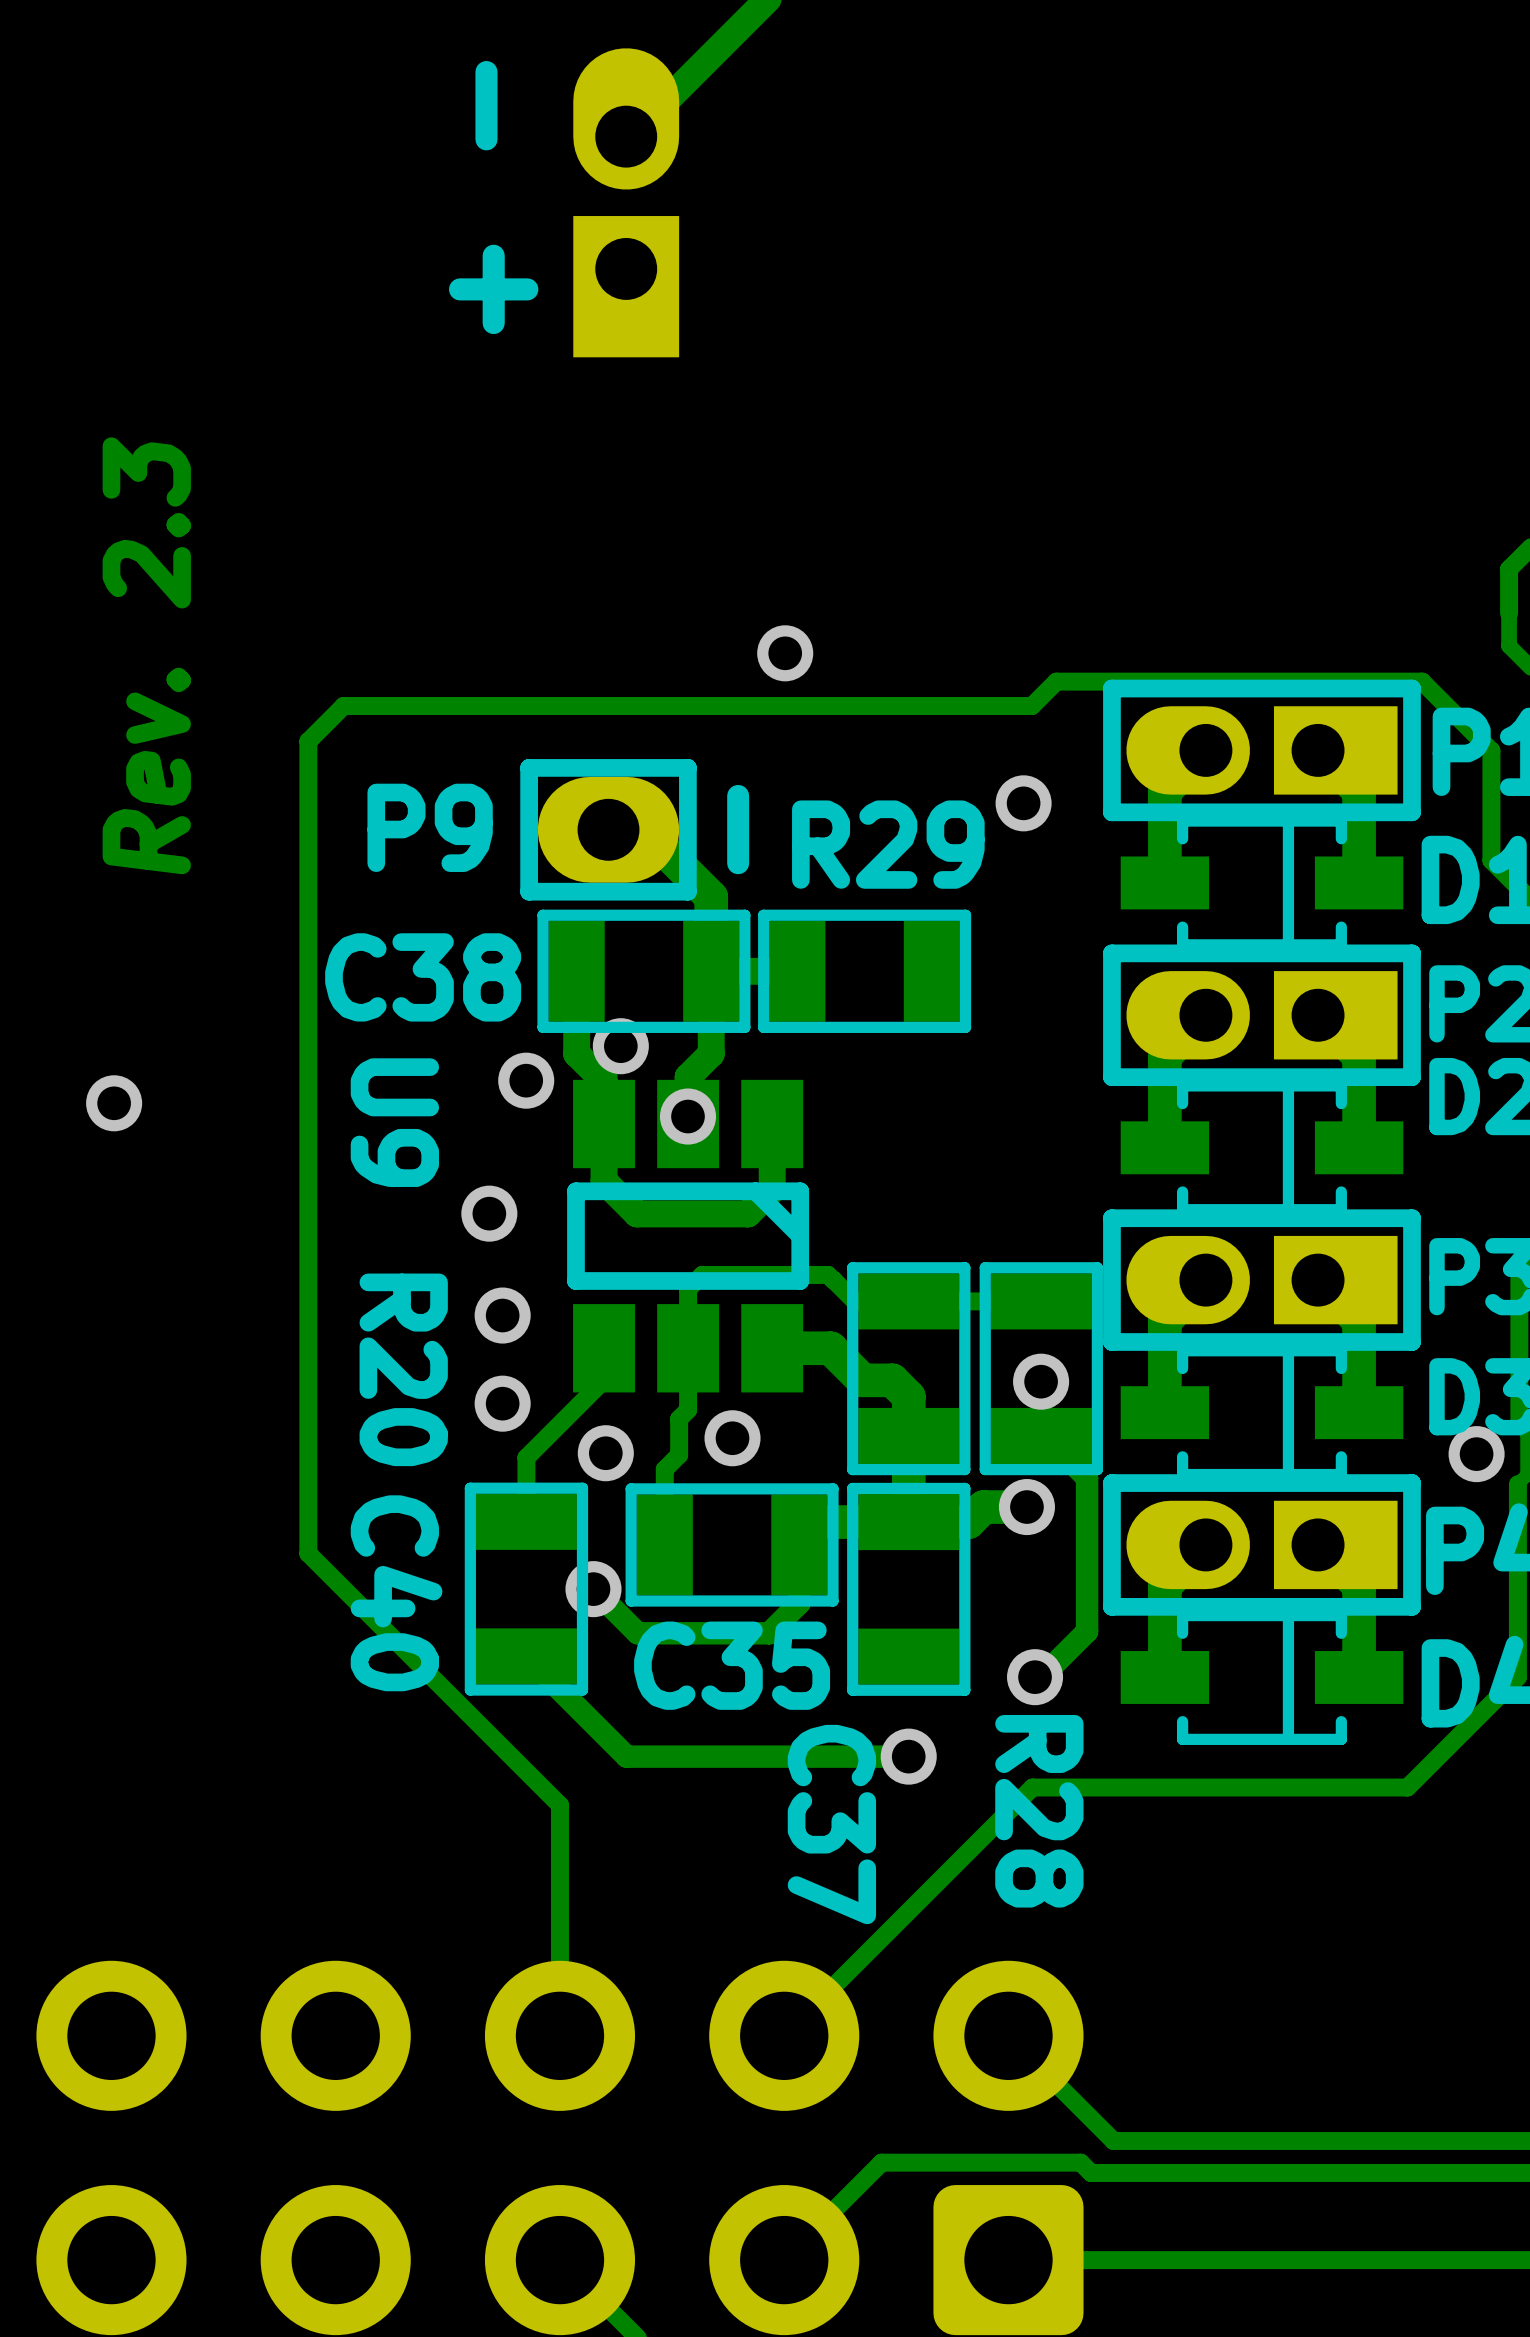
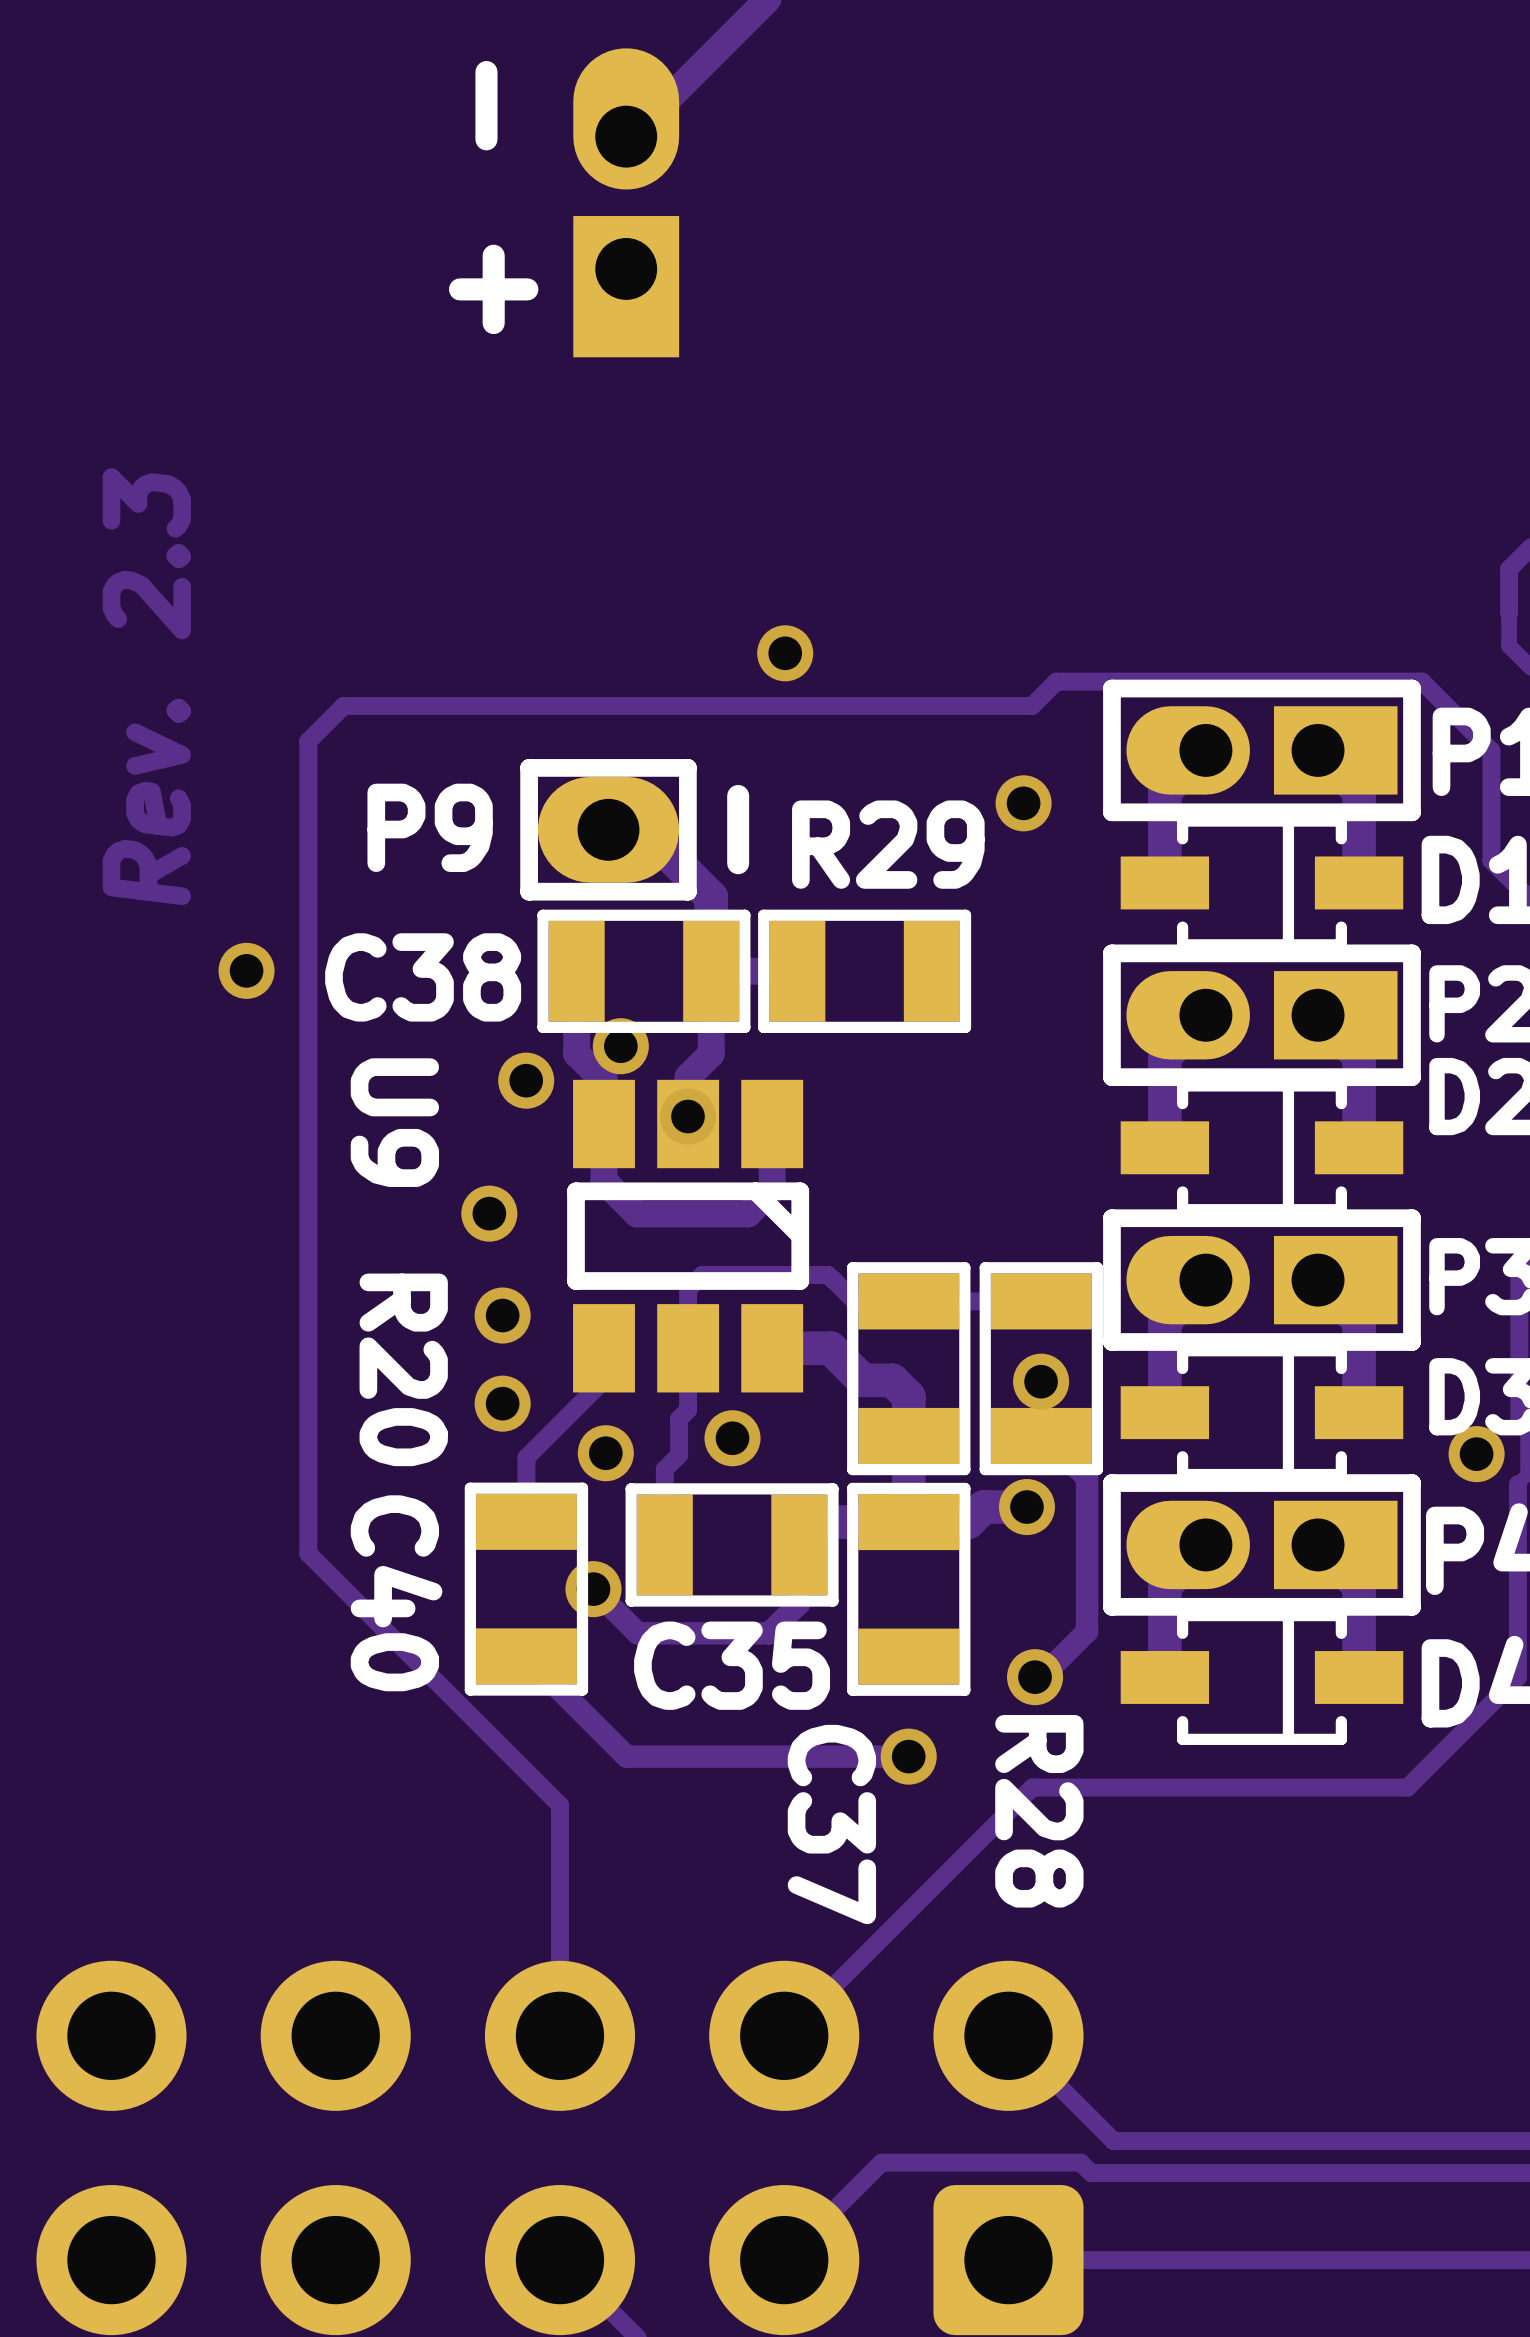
text position: Rev. 2.3 (146, 655) -> Rev. 2.3 (146, 686)
via position: (114, 1103) -> (246, 970)

